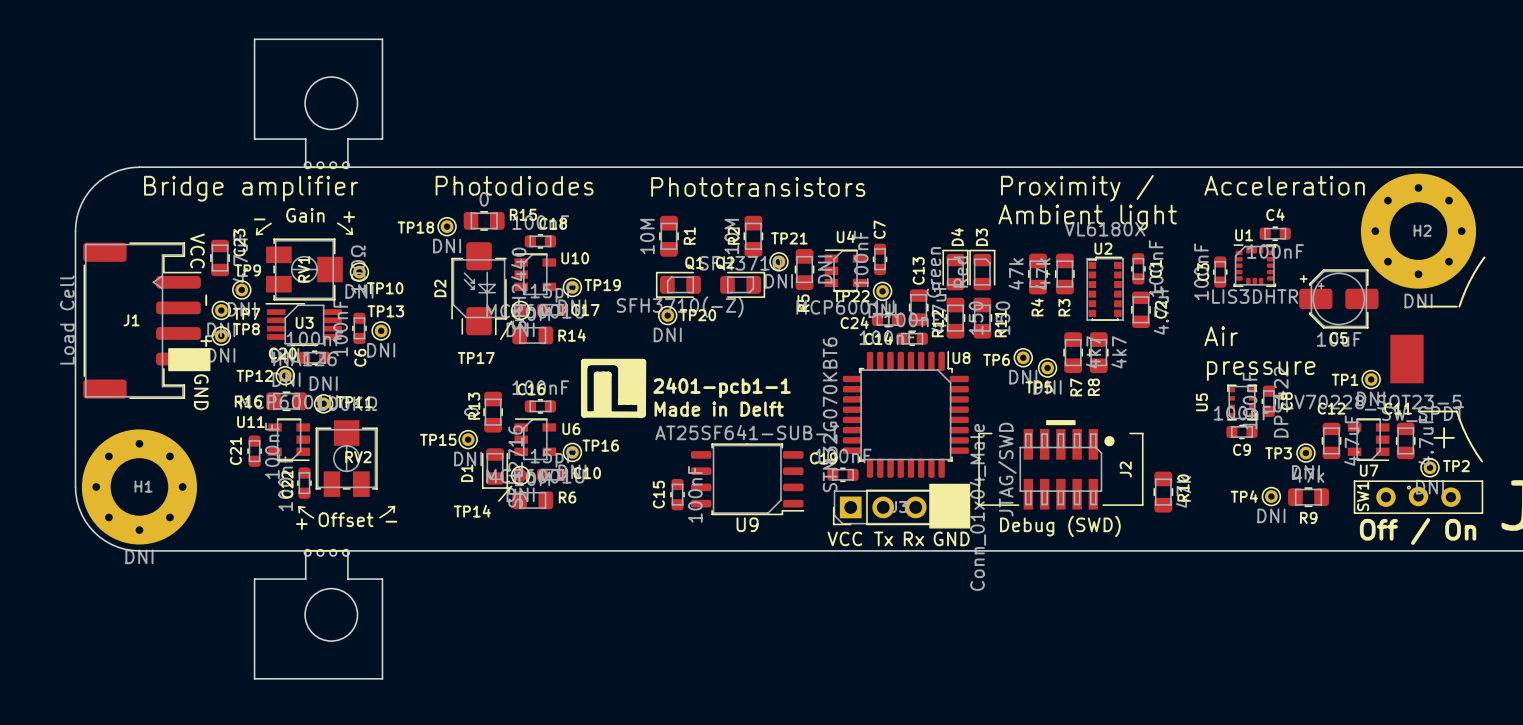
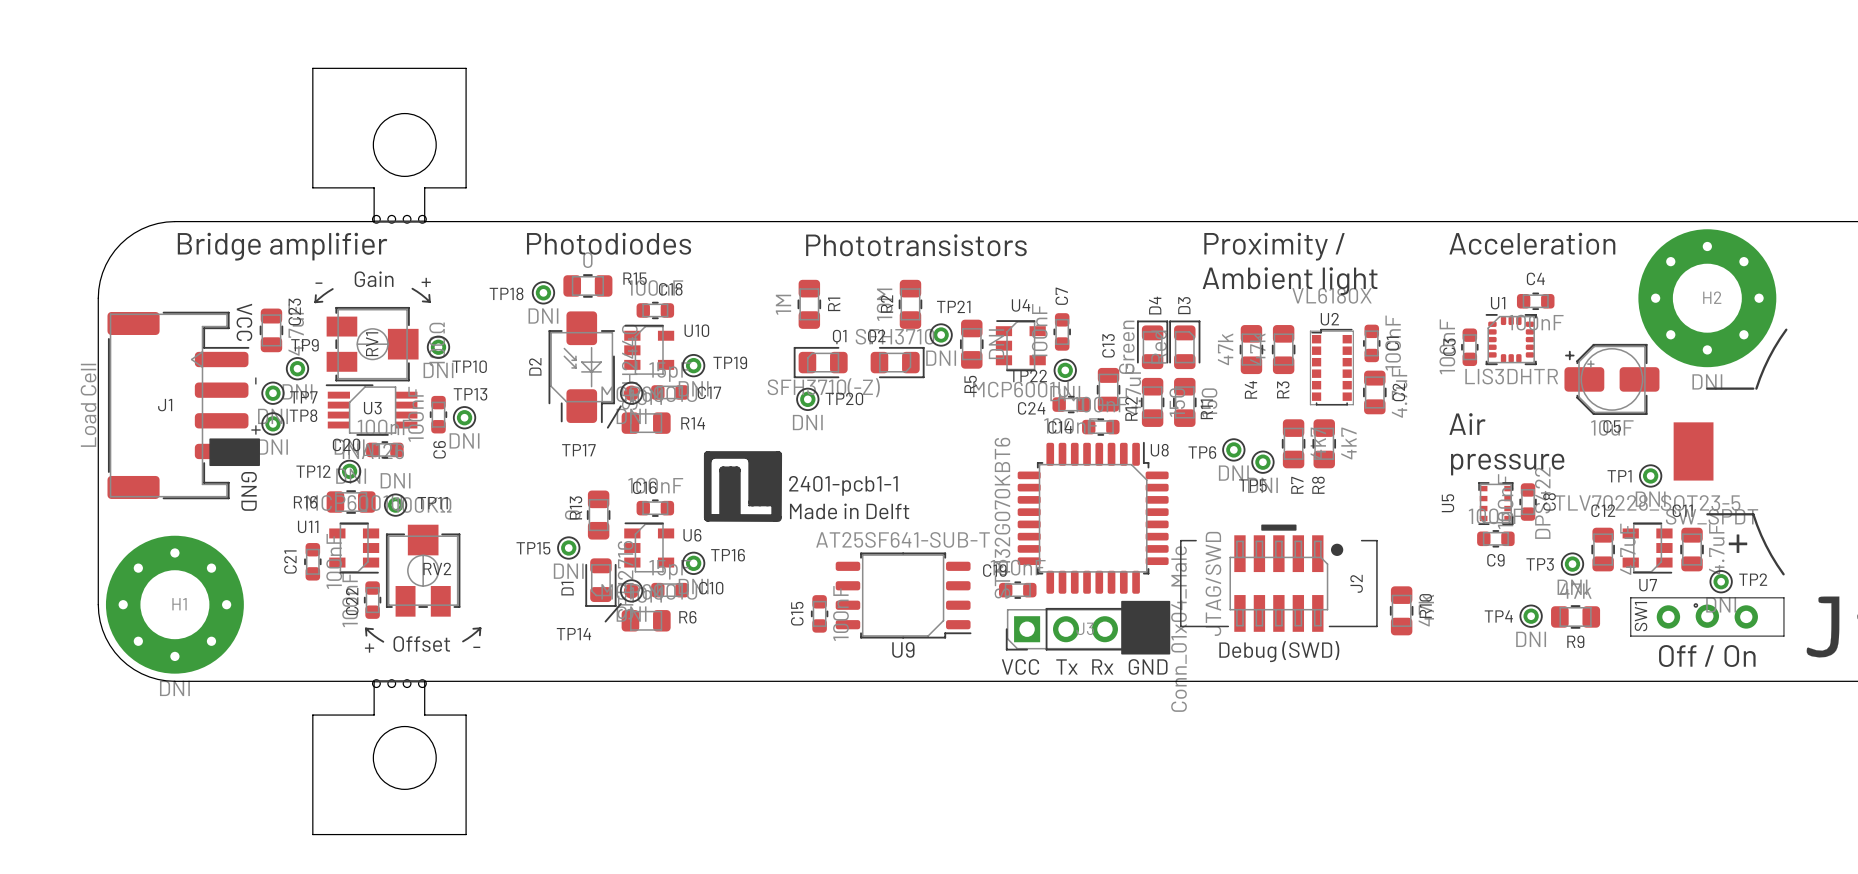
R1 value: 10M (647, 236) -> 1M (783, 304)

